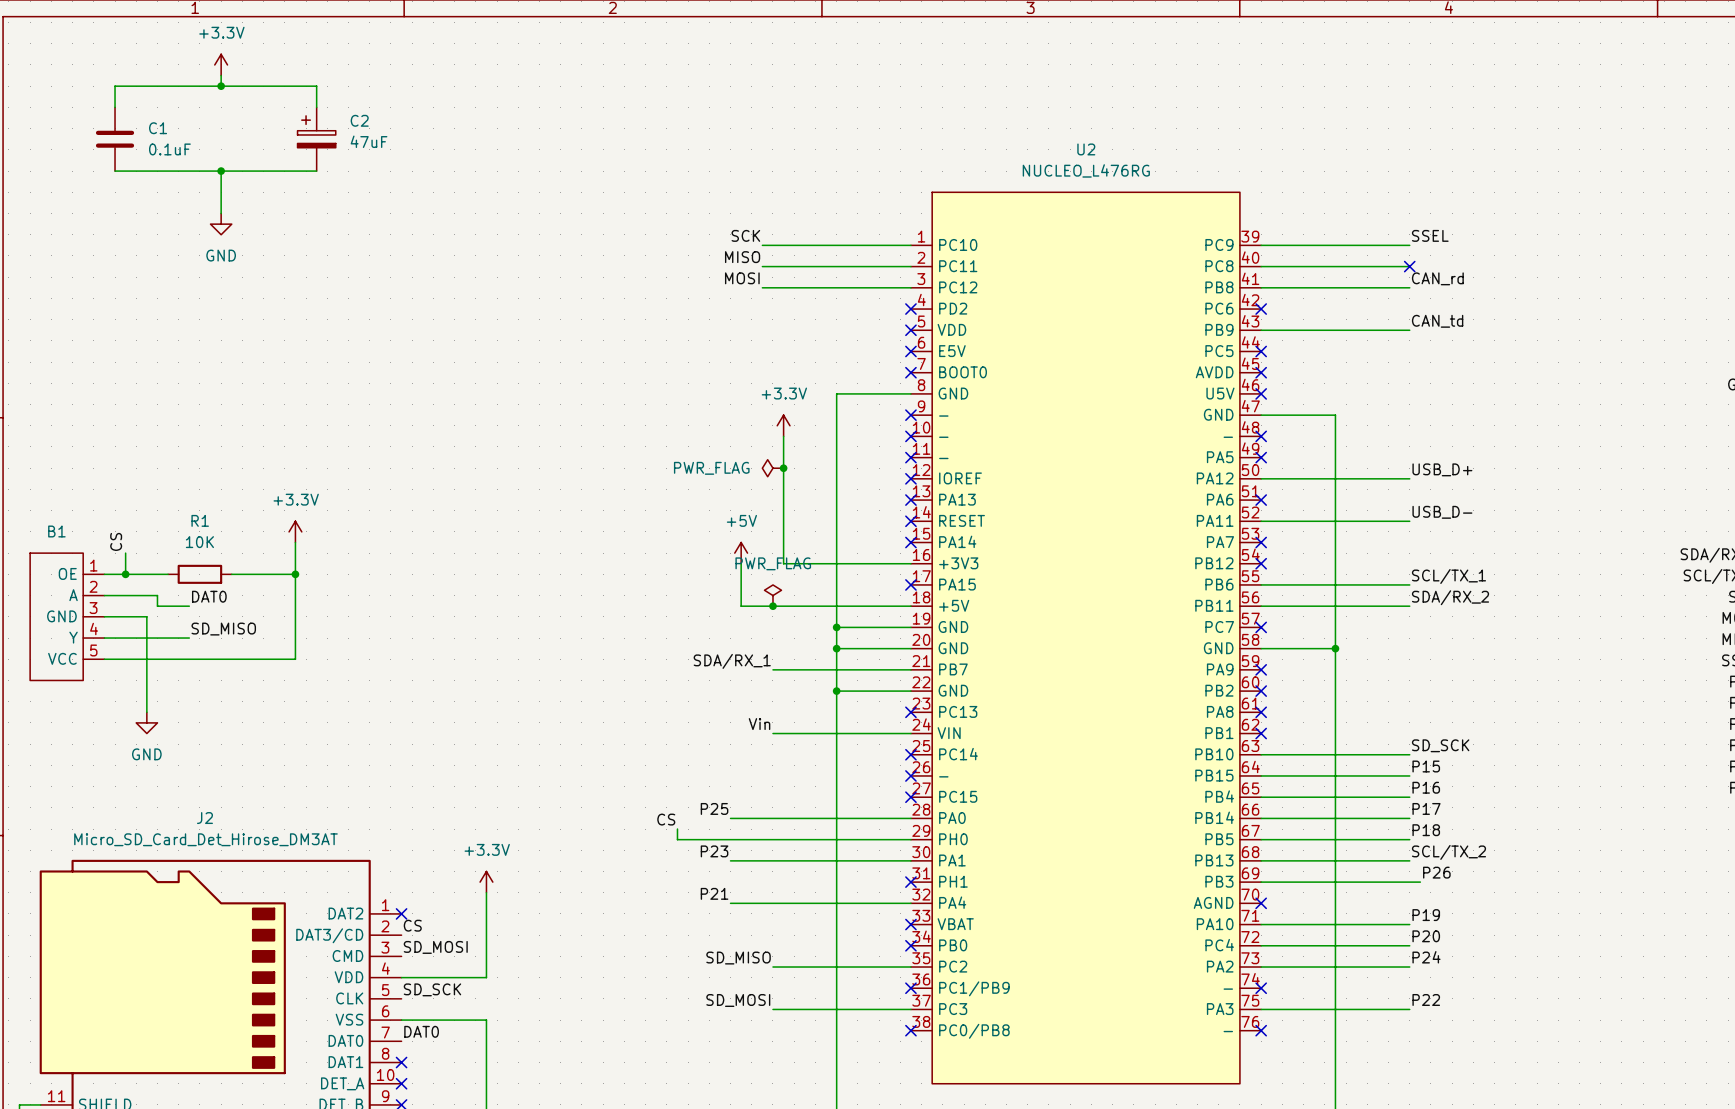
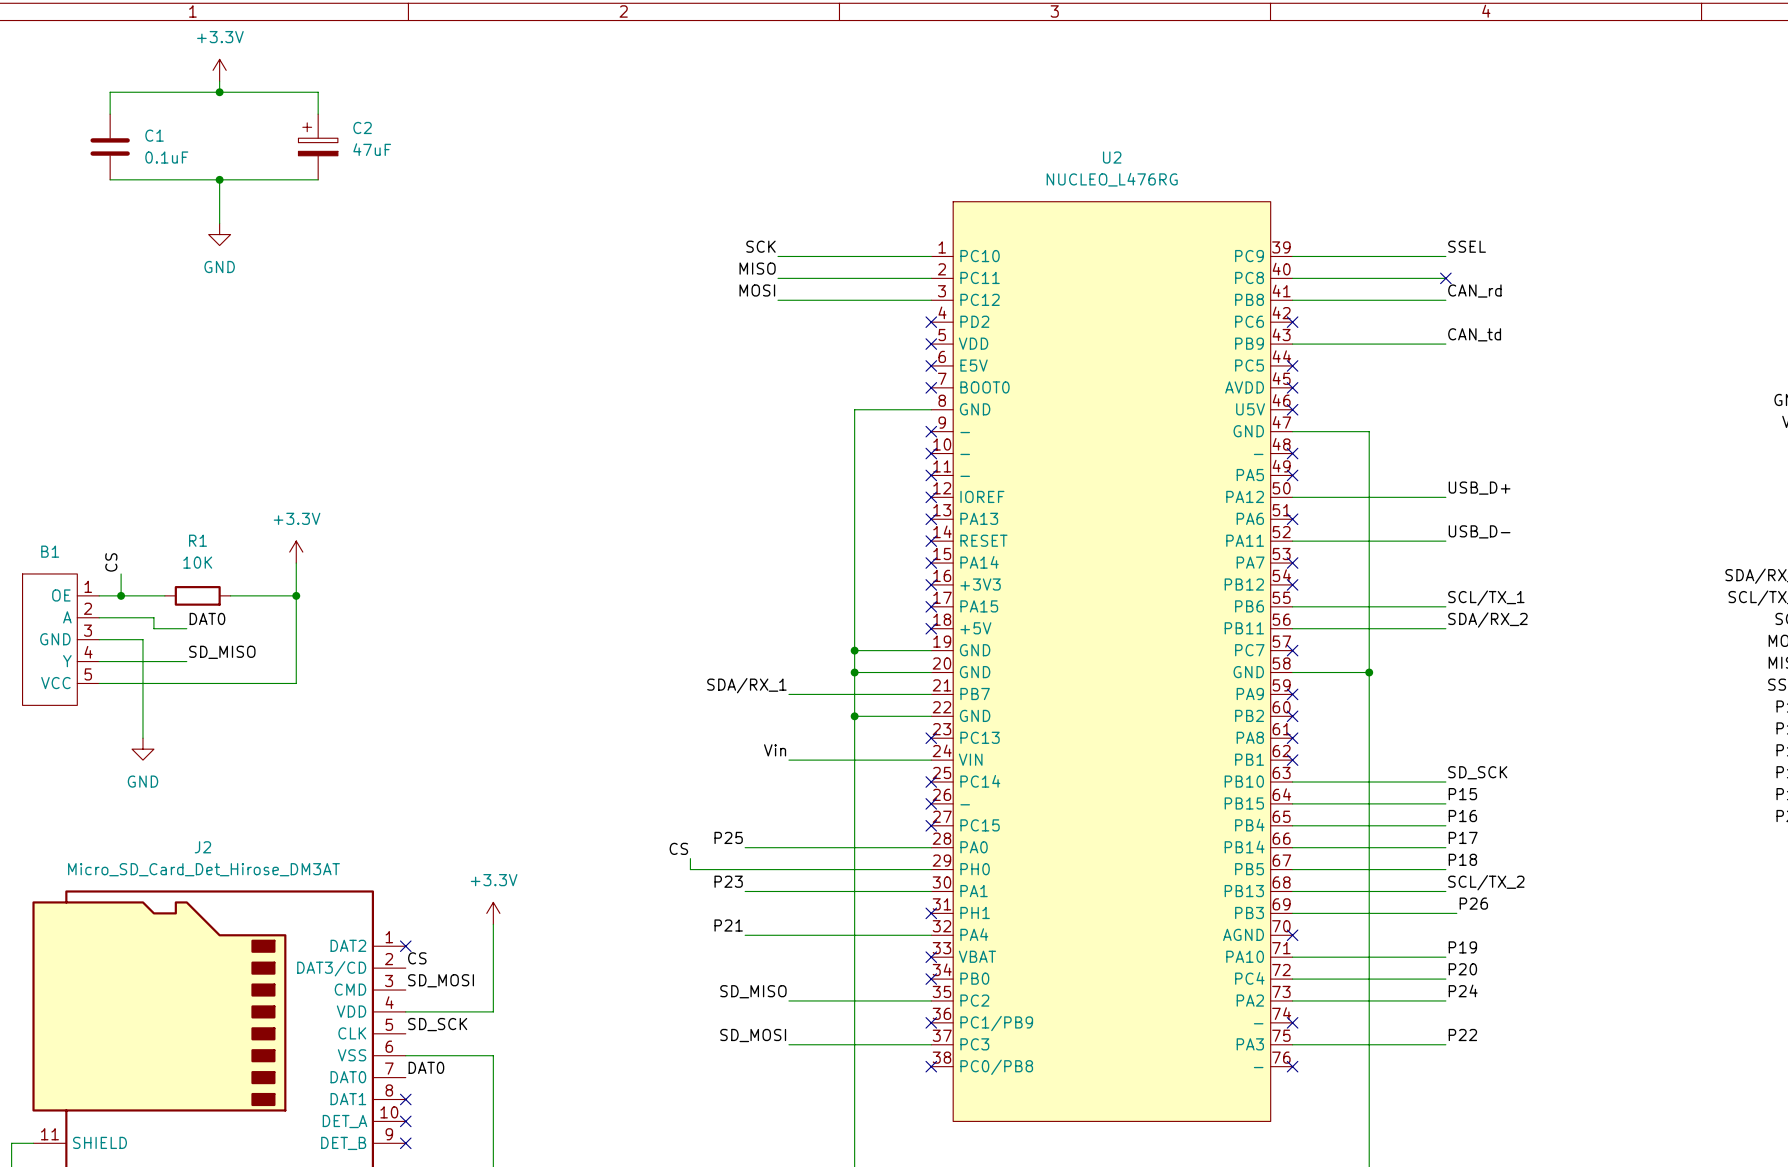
power symbol: +3.3V (783, 425) -> none
wire: (783, 436) (783, 563) (910, 563) -> none
power symbol: PWR_FLAG (772, 468) -> none
junction: (783, 468) -> none
power symbol: +5V (741, 553) -> none
wire: (741, 563) (741, 606) (910, 606) -> none
no-connect mark: none -> (931, 584)
power symbol: PWR_FLAG (772, 595) -> none
junction: (772, 606) -> none
no-connect mark: none -> (931, 628)

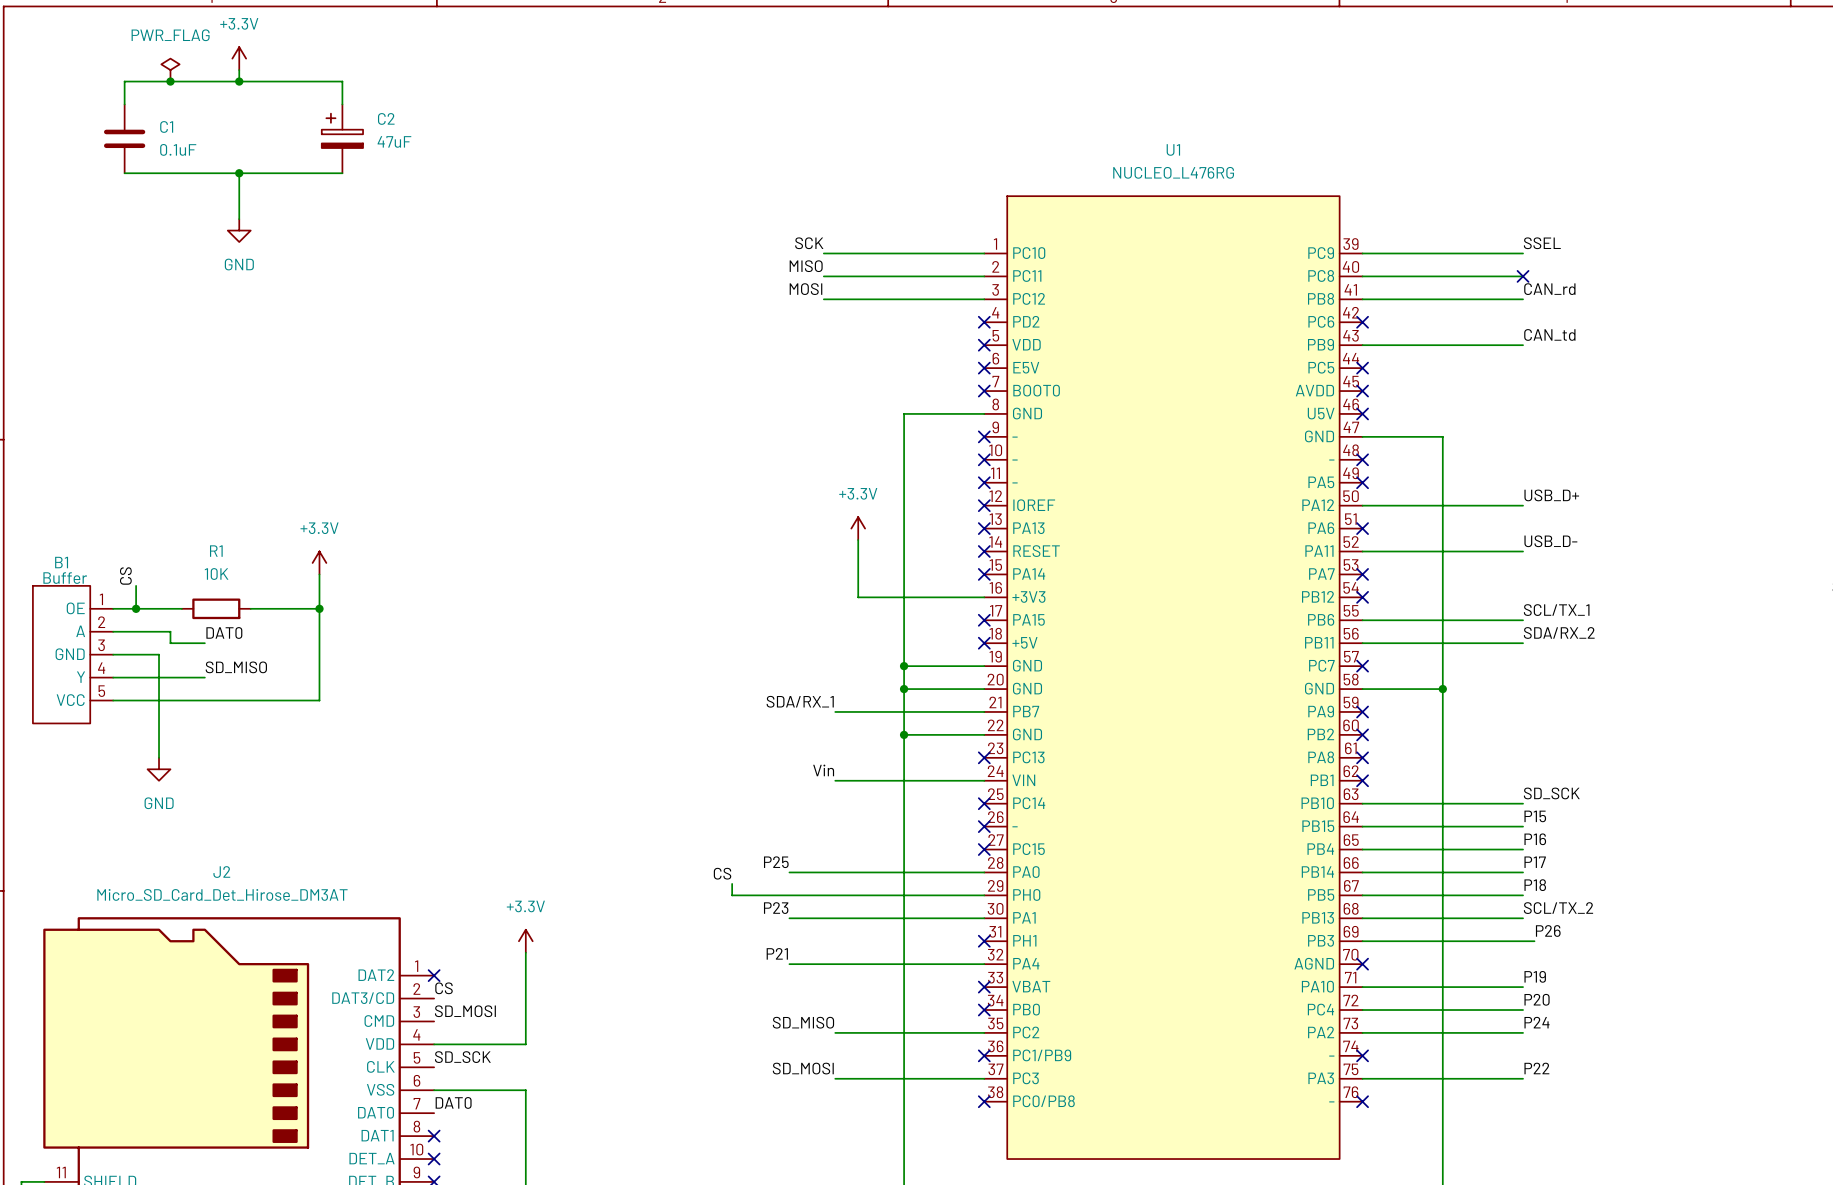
power symbol: none -> PWR_FLAG (170, 70)
junction: none -> (170, 81)
U2 name: U2 (1112, 157) -> U1 (1173, 149)
power symbol: none -> +3.3V (858, 528)
wire: none -> (858, 540) (858, 597) (984, 597)
B1 value: none -> Buffer (65, 578)
no-connect mark: (931, 584) -> none

